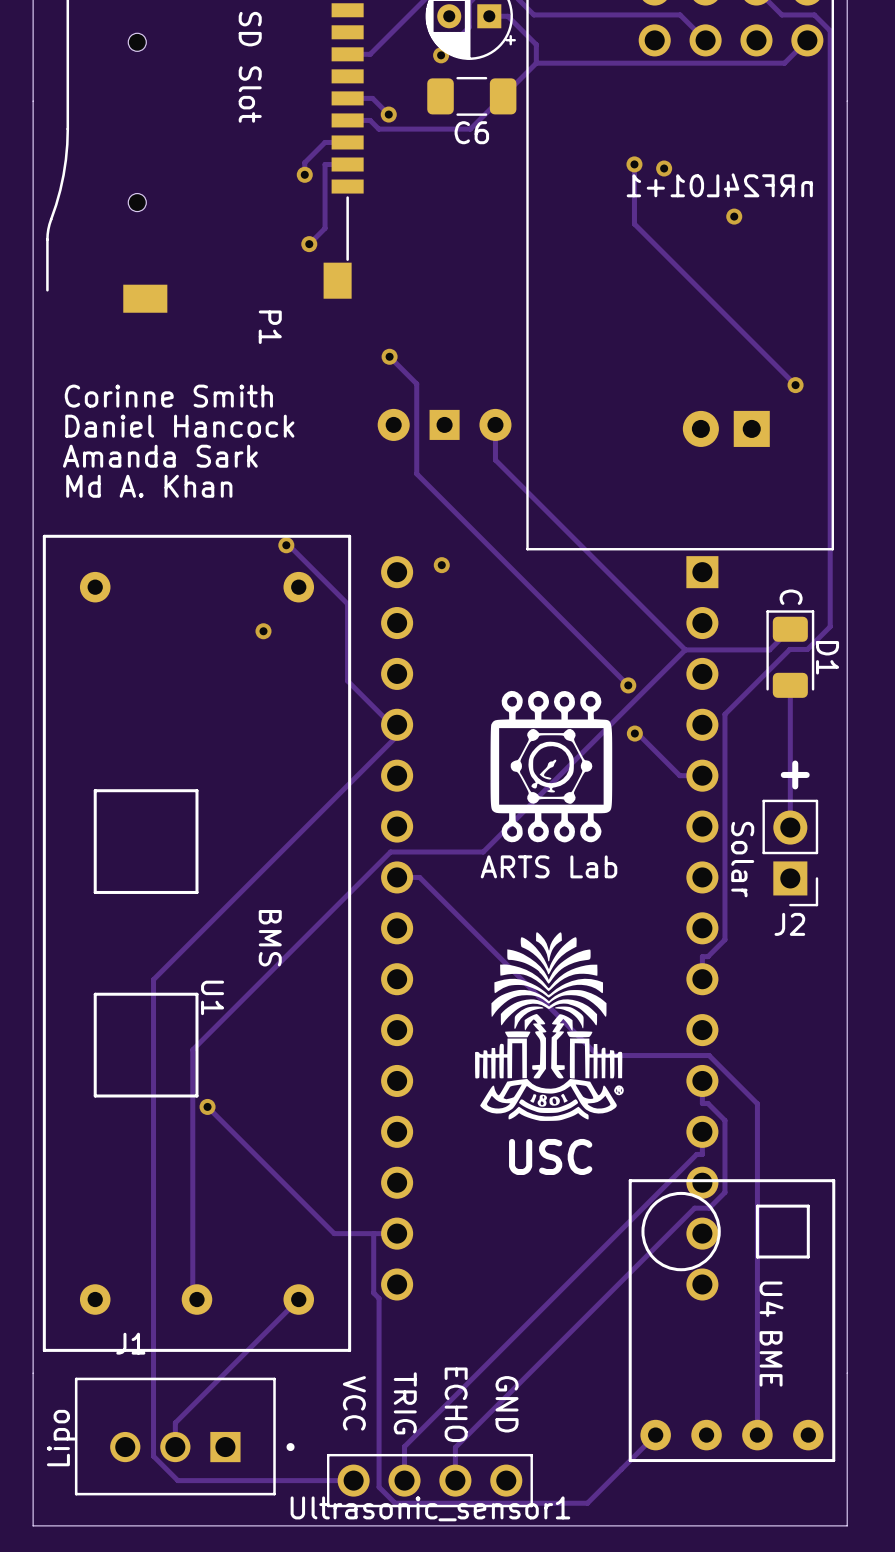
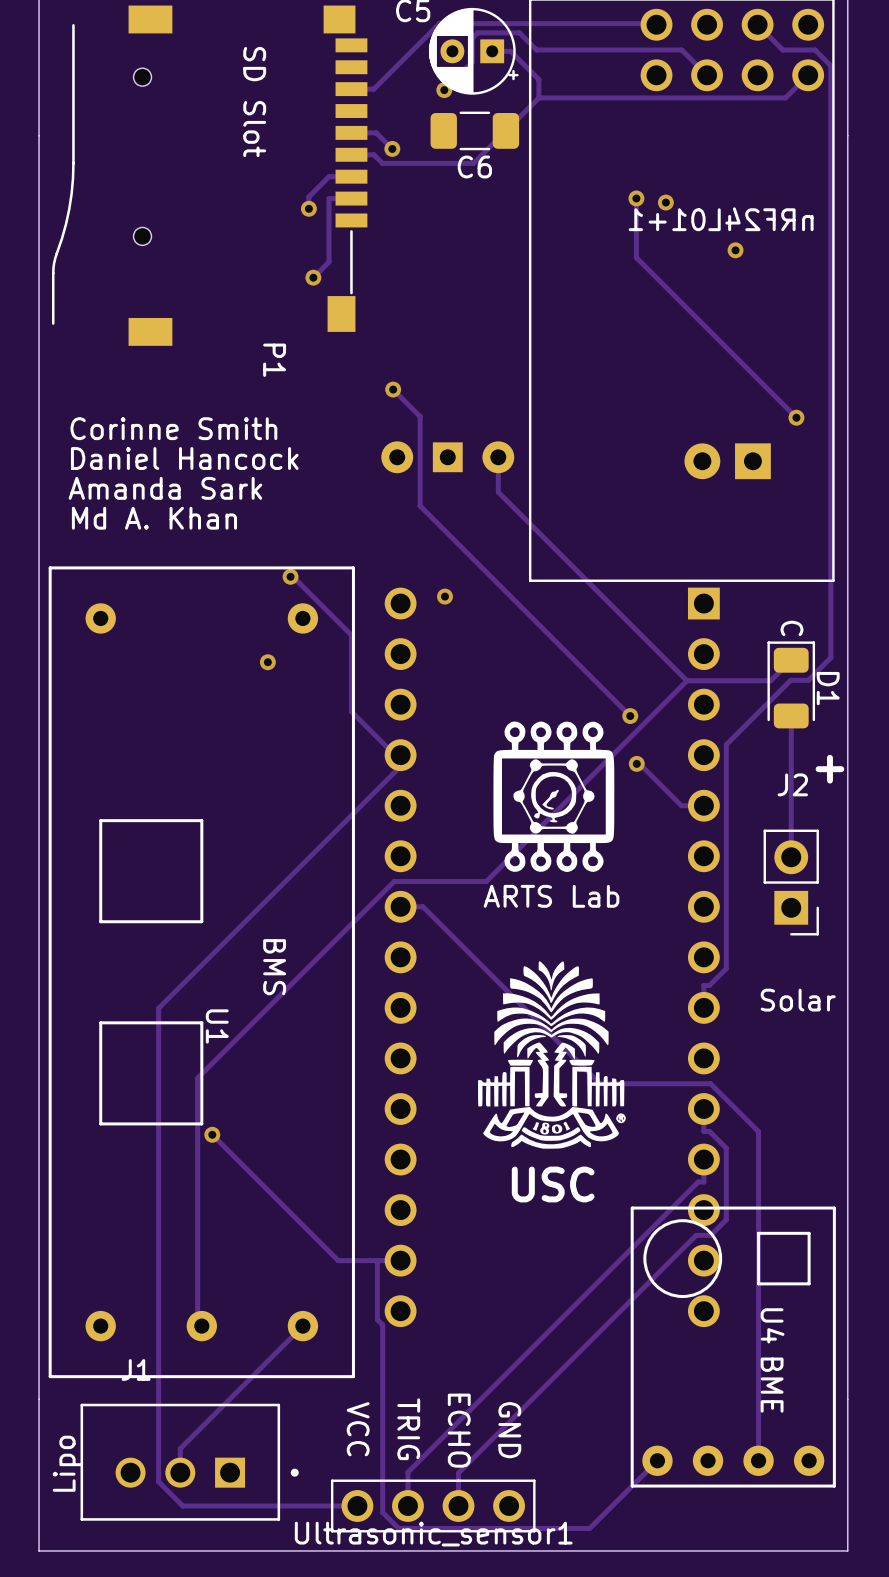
text position: + (795, 774) -> + (829, 769)
text rotation: 0° (742, 859) -> 90° counterclockwise (798, 1000)
text position: Solar (742, 859) -> Solar (798, 1000)
J2 name position: J2 (789, 924) -> J2 (792, 784)

